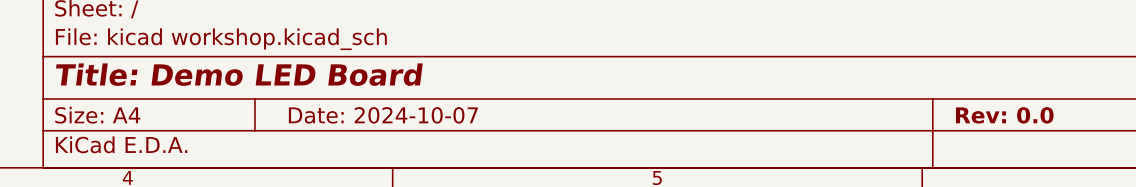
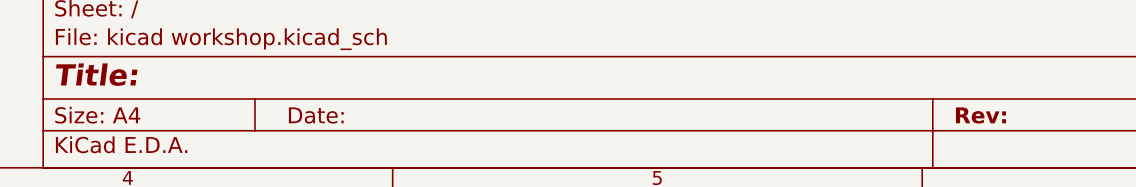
title block: Title: Demo LED Board (239, 74) -> Title: (96, 74)
title block: Date: 2024-10-07 (383, 115) -> Date: (316, 115)
title block: Rev: 0.0 (1004, 115) -> Rev: (980, 115)

